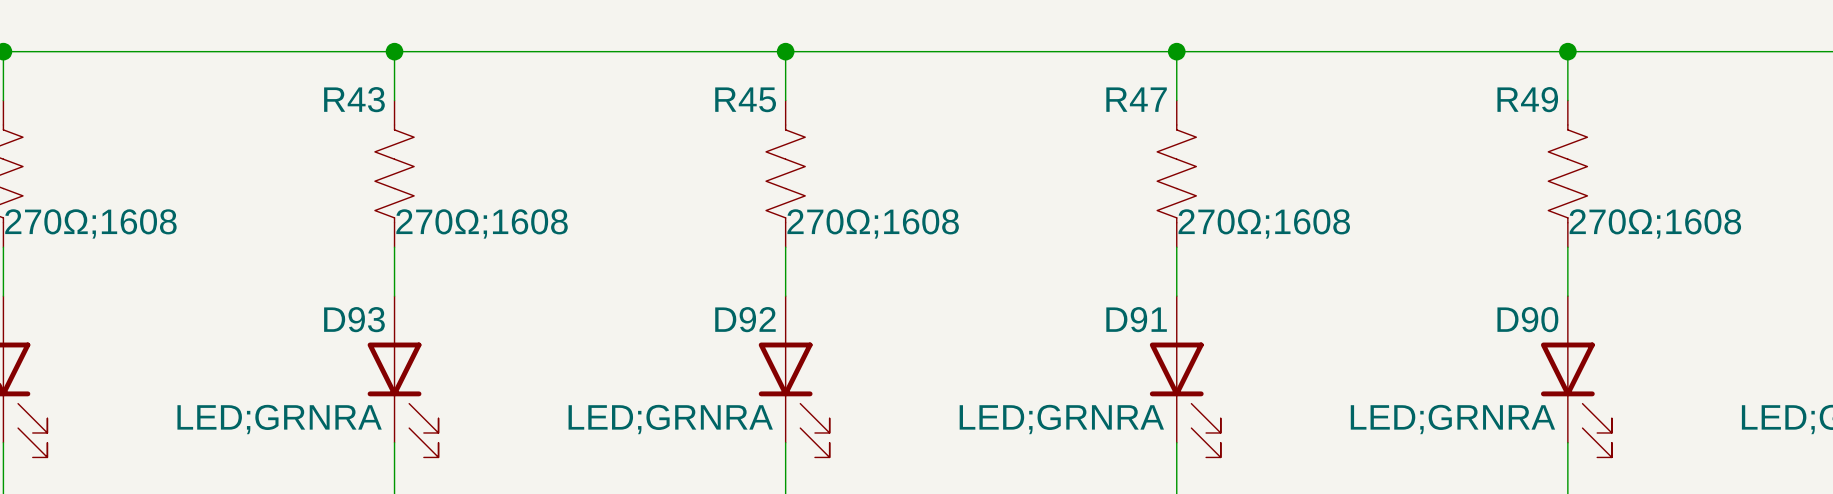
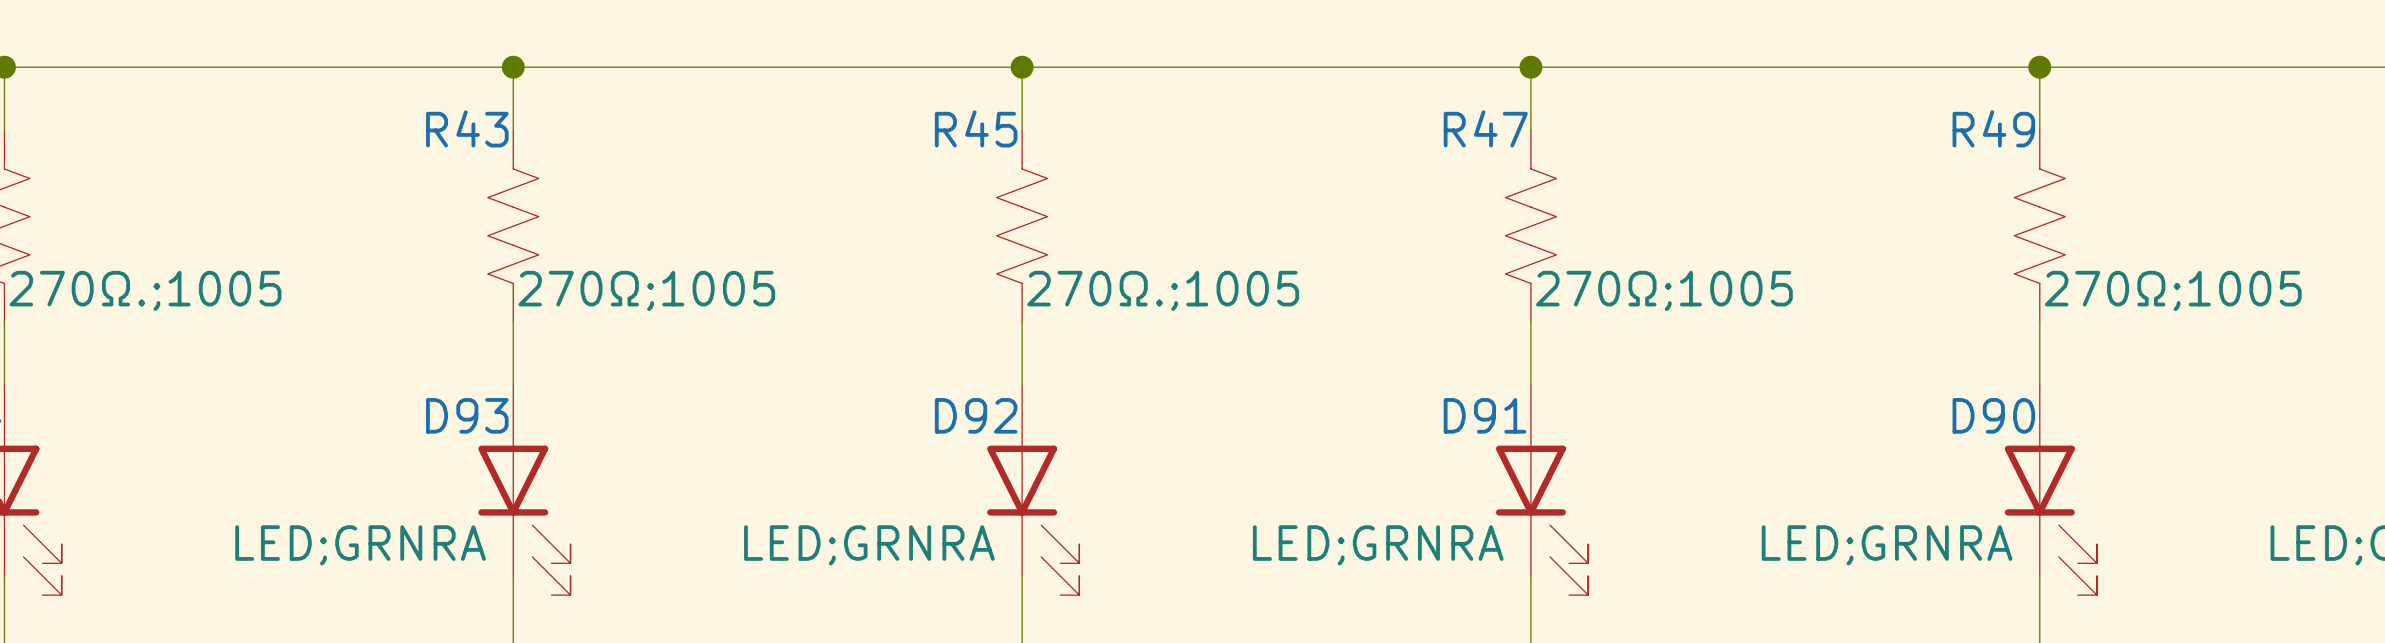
part value: 270Ω;1608 (90, 223) -> 270Ω.;1005 (145, 290)
R43 value: 270Ω;1608 (482, 223) -> 270Ω;1005 (646, 290)
R45 value: 270Ω;1608 (873, 223) -> 270Ω.;1005 (1163, 290)
R47 value: 270Ω;1608 (1264, 223) -> 270Ω;1005 (1664, 290)
R49 value: 270Ω;1608 (1655, 223) -> 270Ω;1005 (2173, 290)

